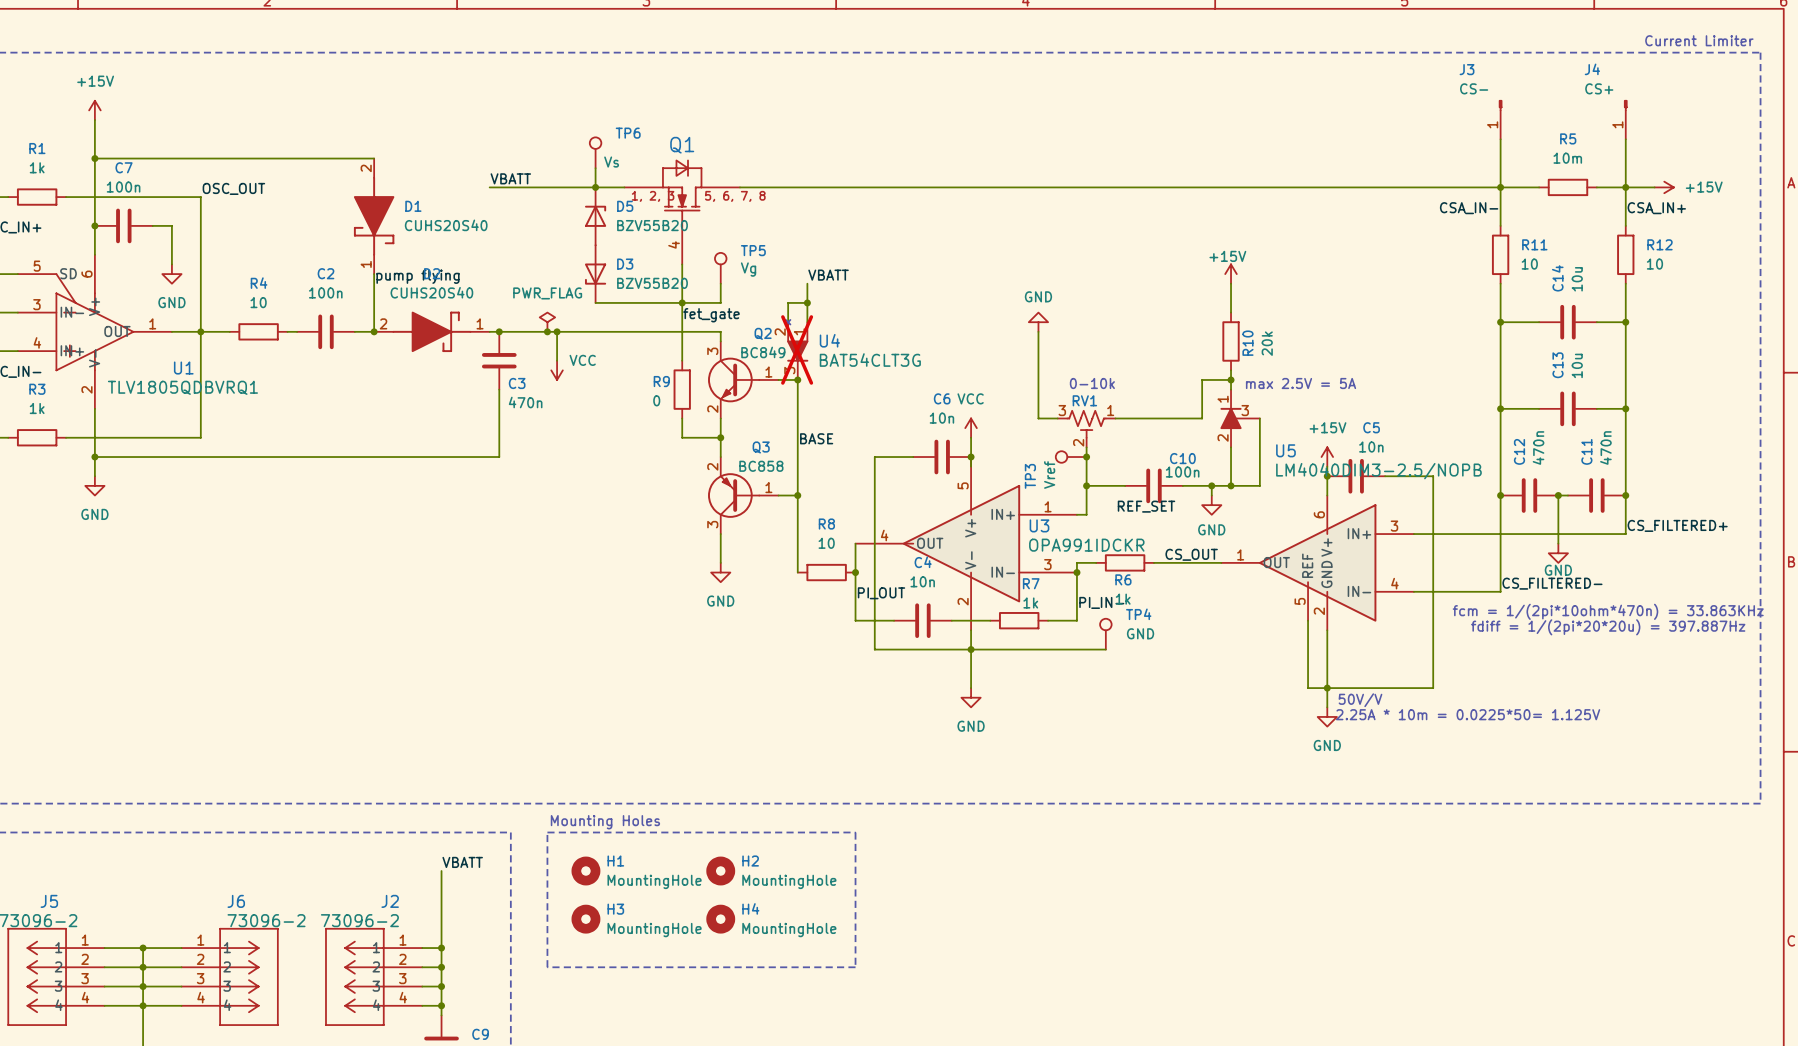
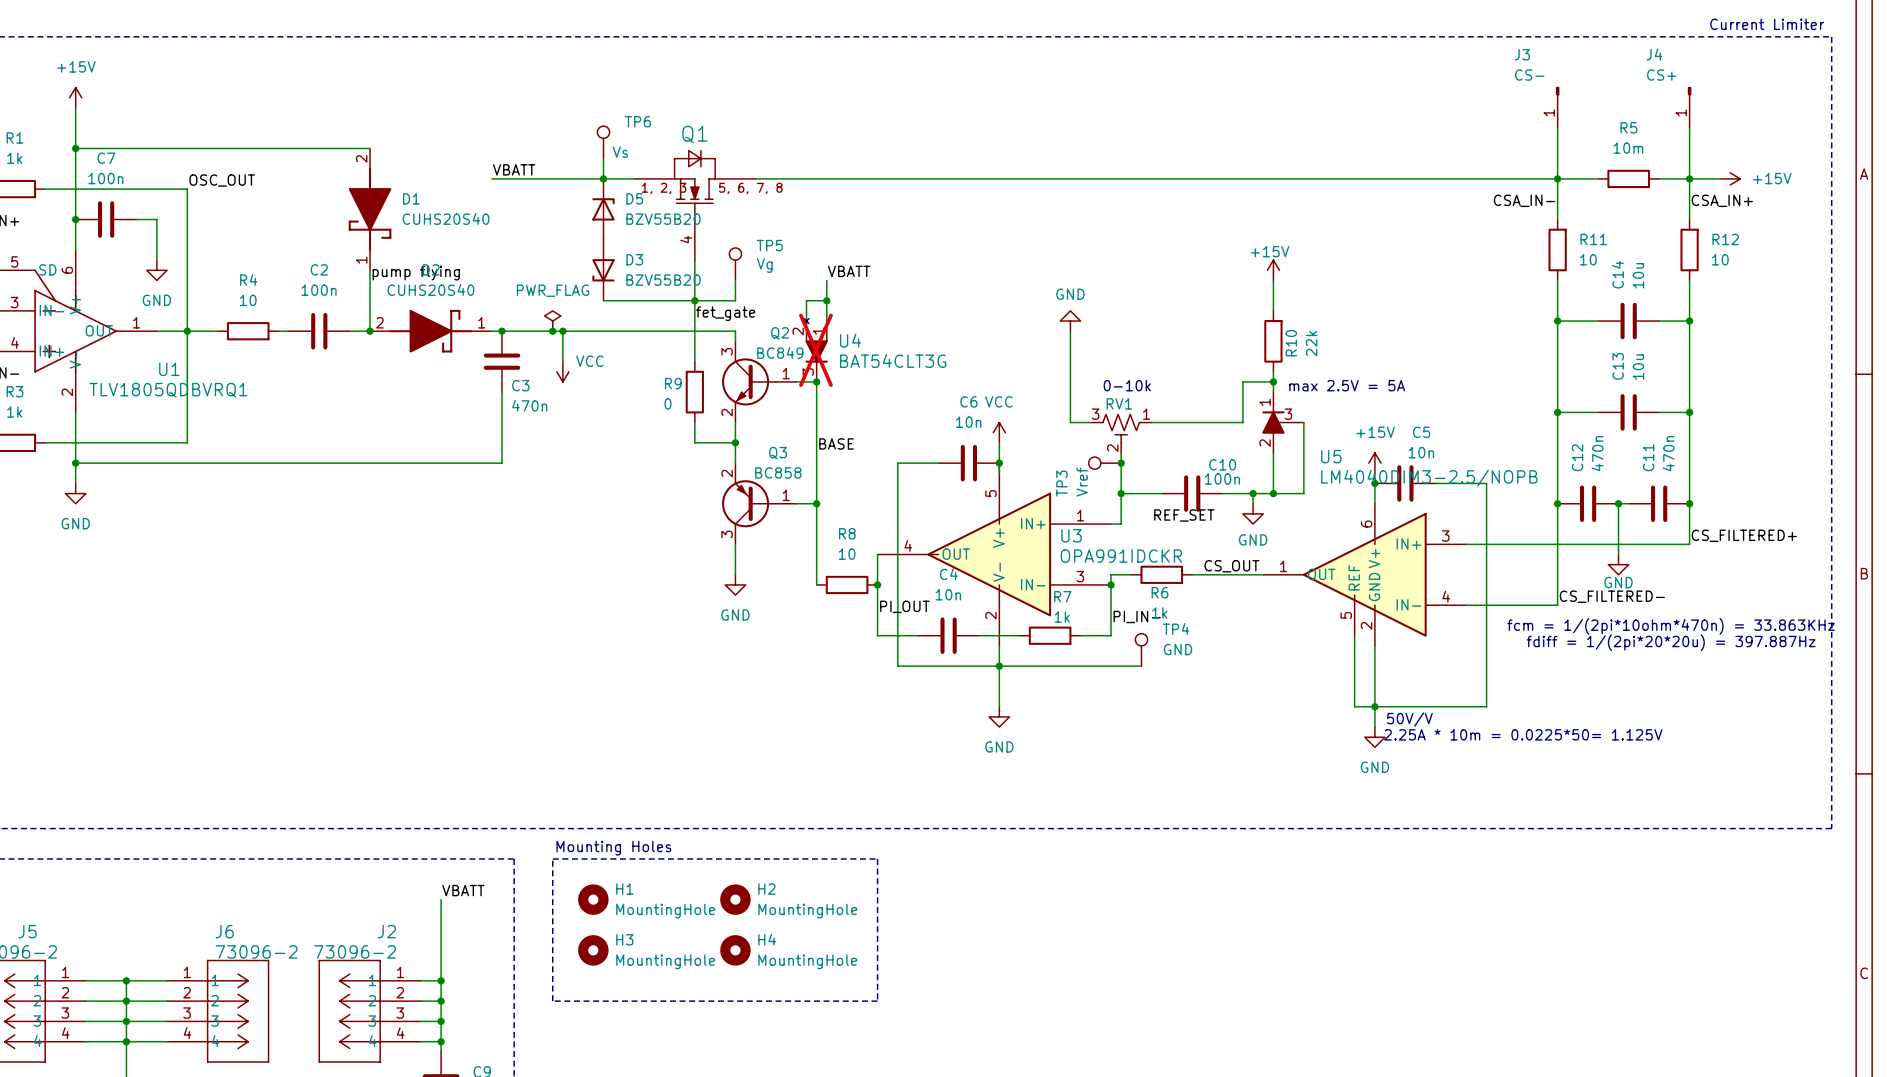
R10 value: 20k (1267, 343) -> 22k (1311, 343)

